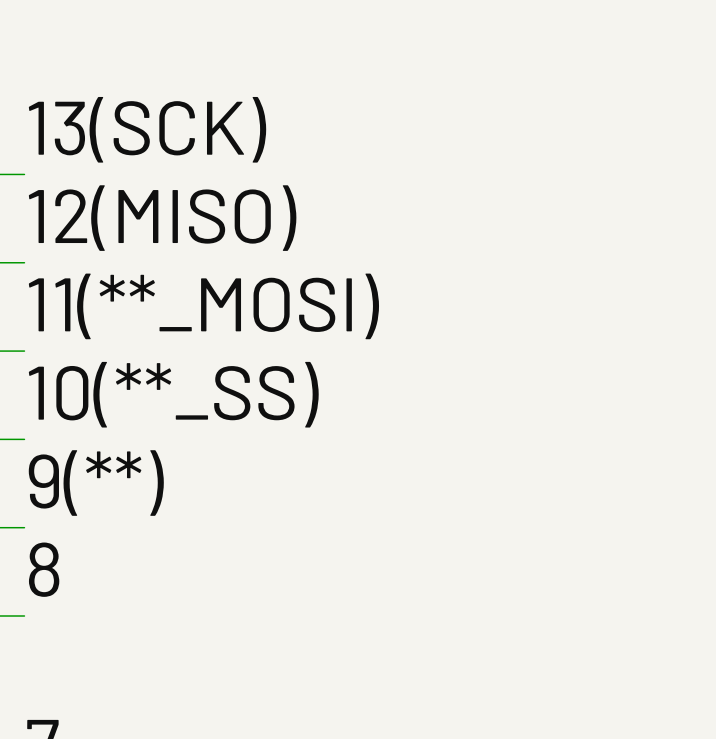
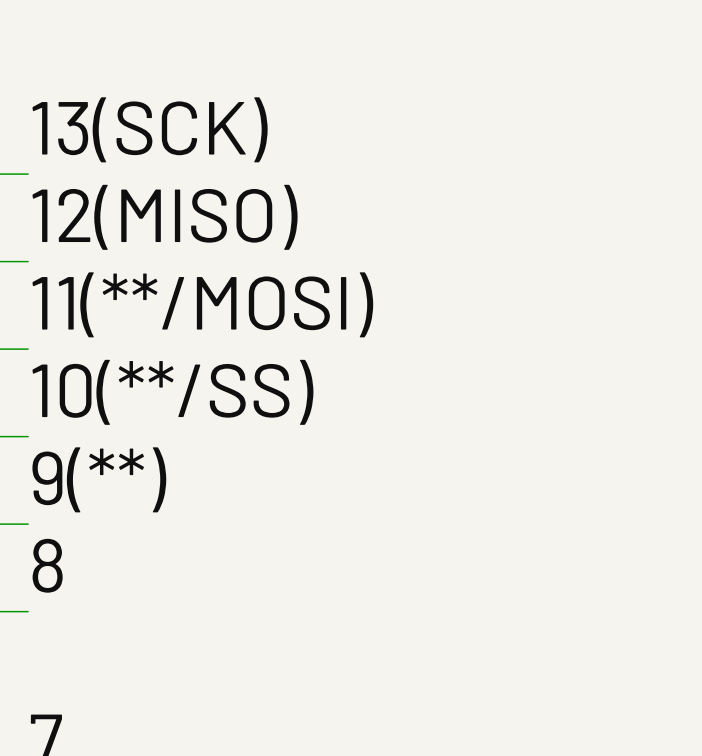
label: 11(**_MOSI) (203, 306) -> 11(**/MOSI) (202, 304)
label: 10(**_SS) (173, 394) -> 10(**/SS) (172, 392)

